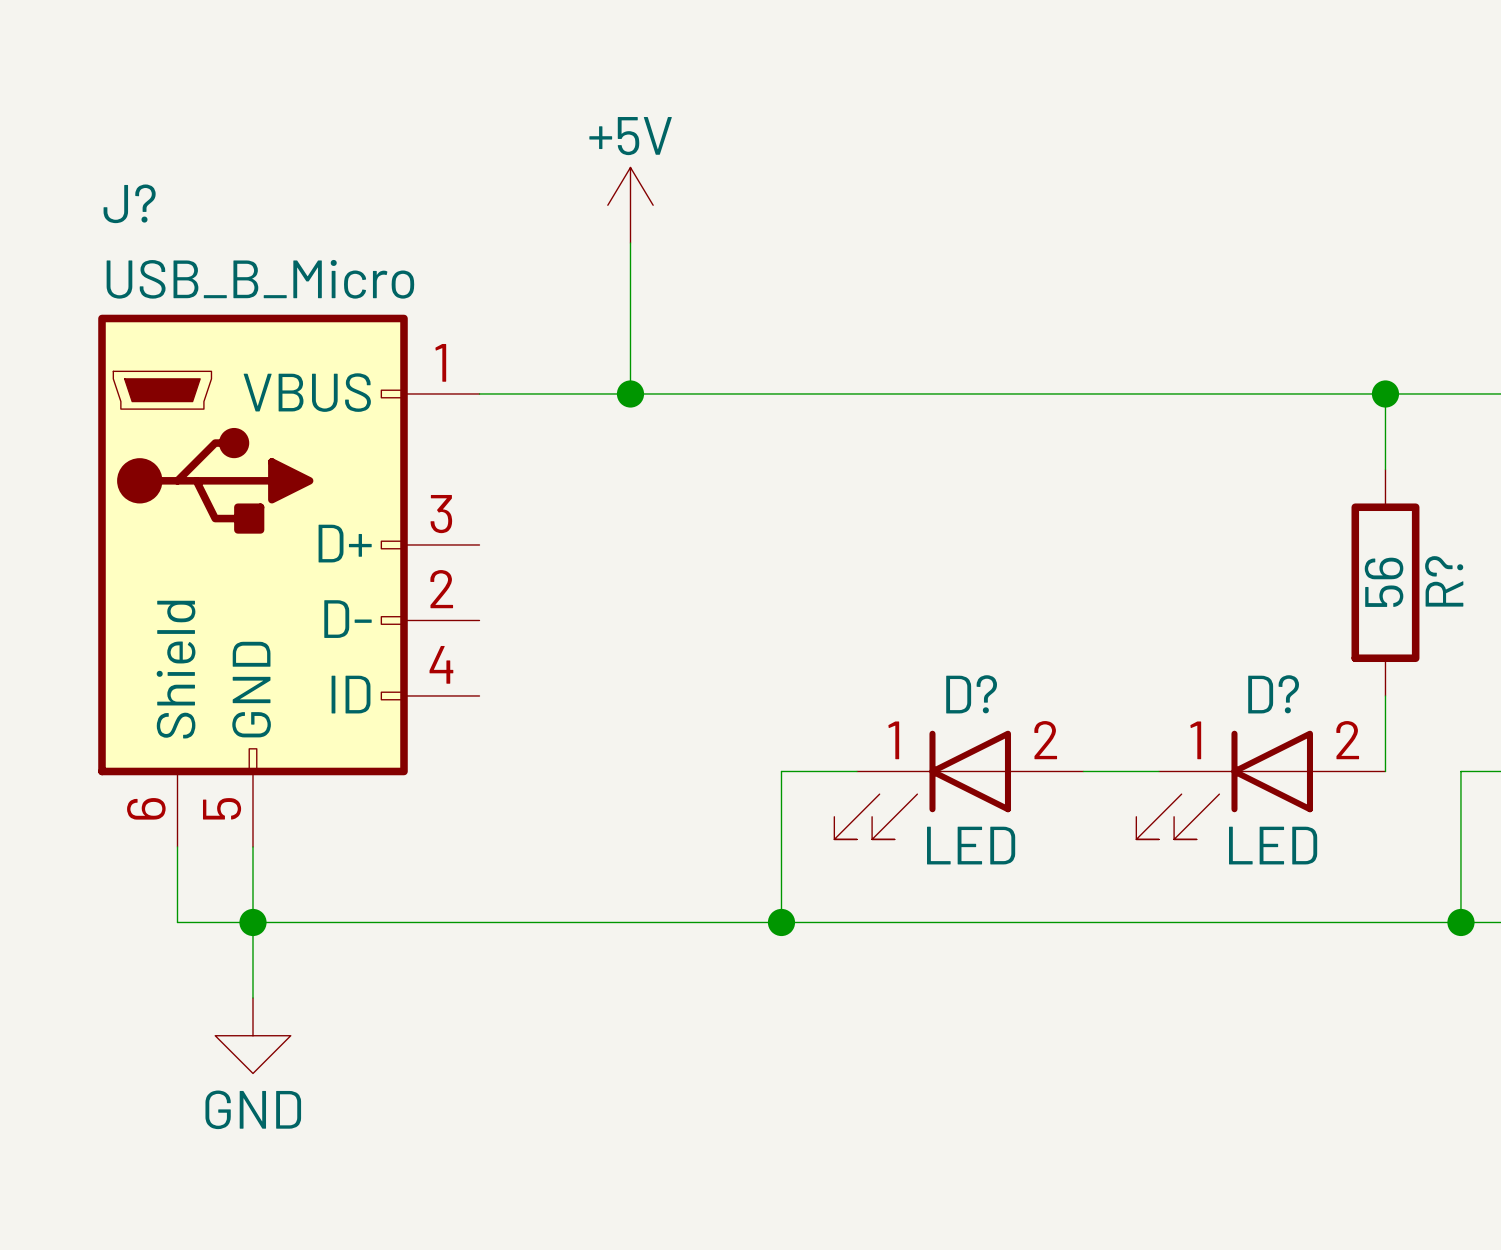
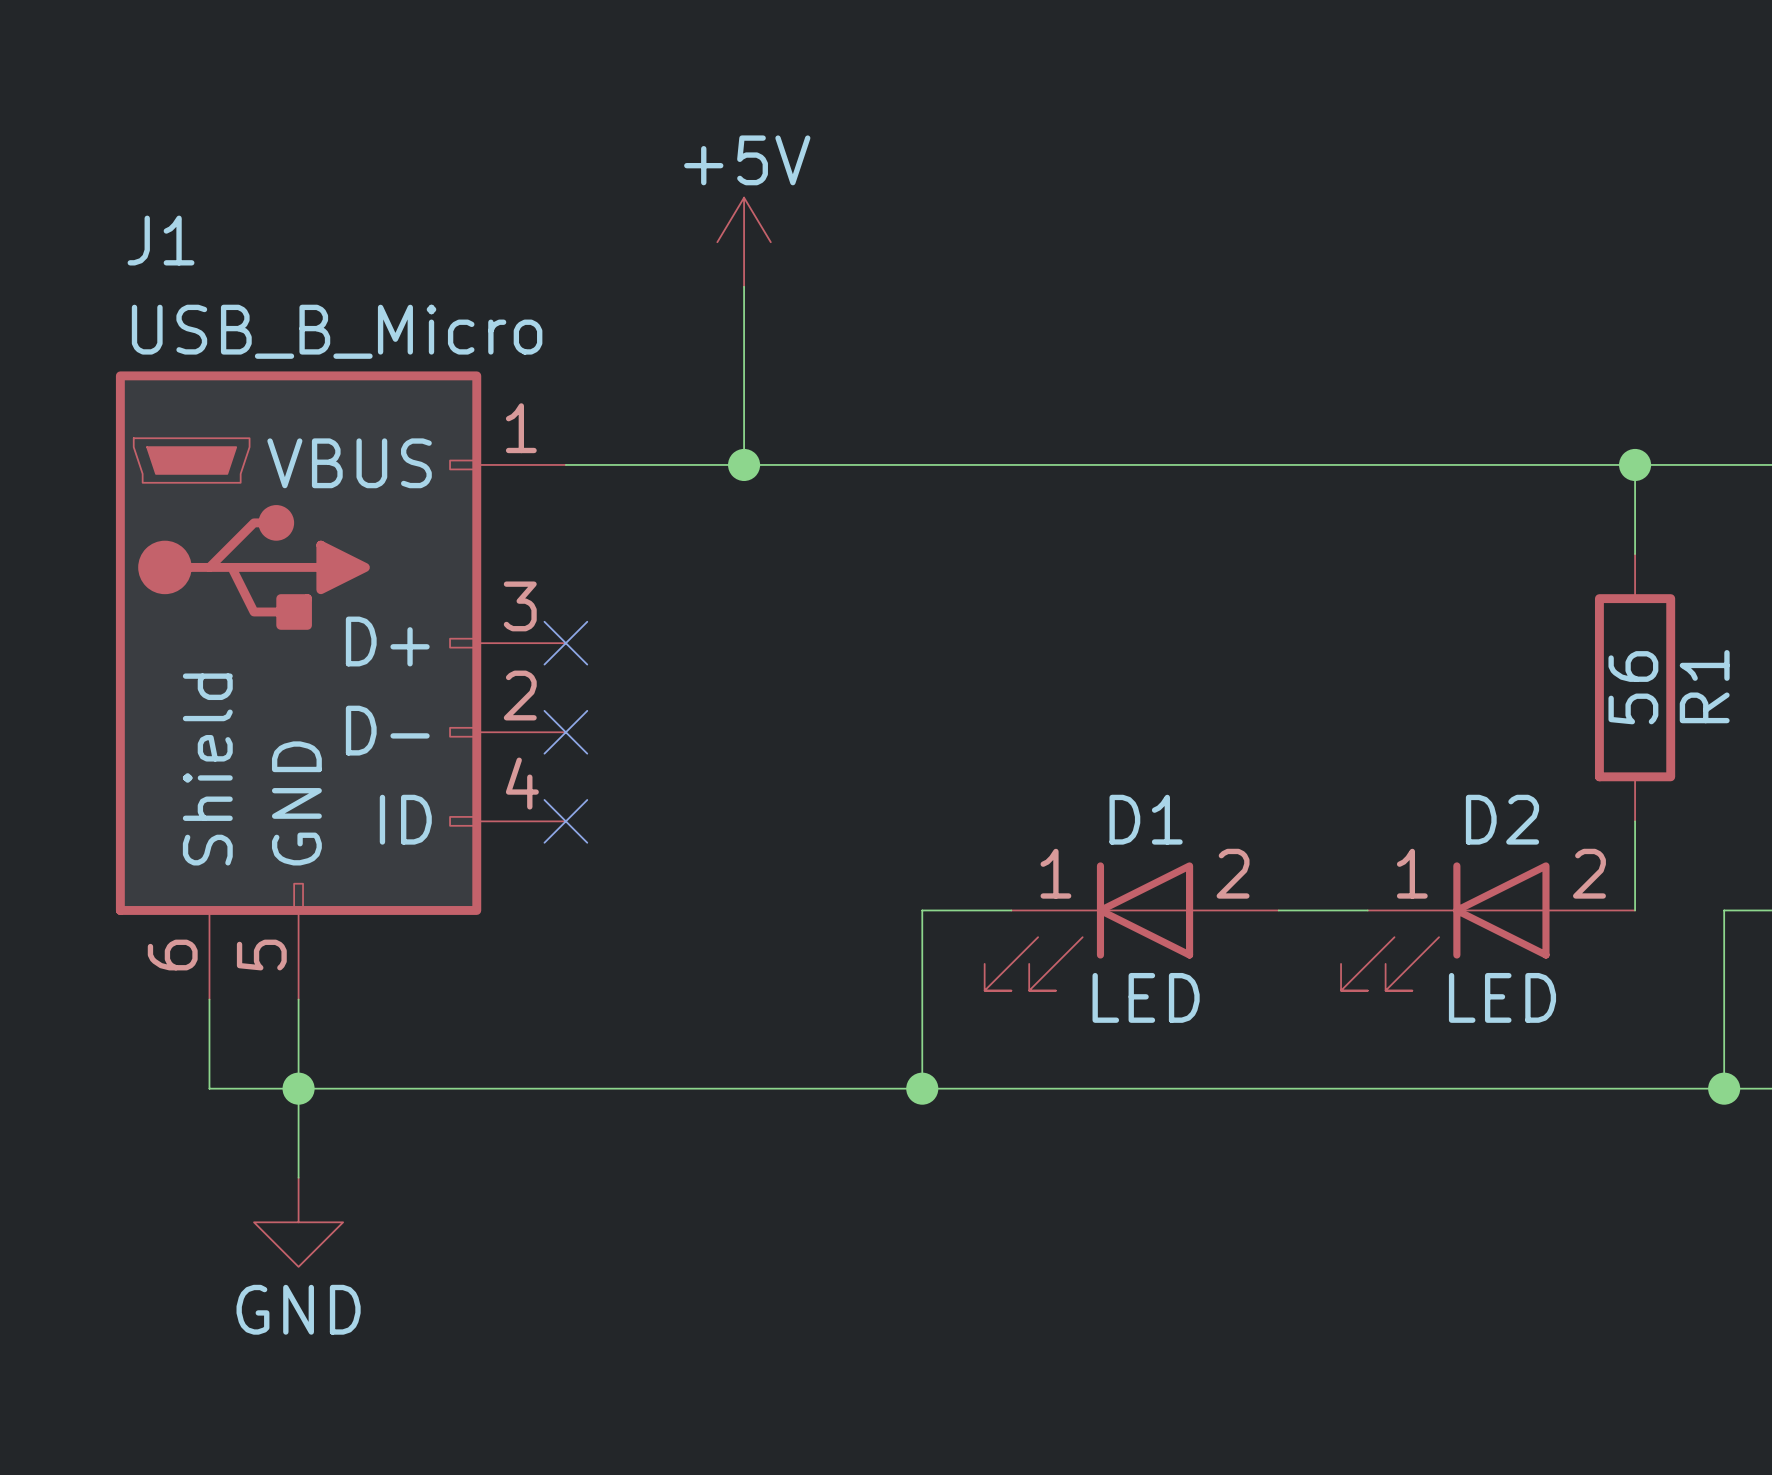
J? name: J? (129, 203) -> J1 (161, 240)
no-connect mark: none -> (565, 643)
R? name: R? (1444, 581) -> R1 (1704, 686)
no-connect mark: none -> (565, 732)
D? name: D? (971, 694) -> D1 (1146, 819)
D? name: D? (1273, 694) -> D2 (1502, 819)
no-connect mark: none -> (565, 821)

